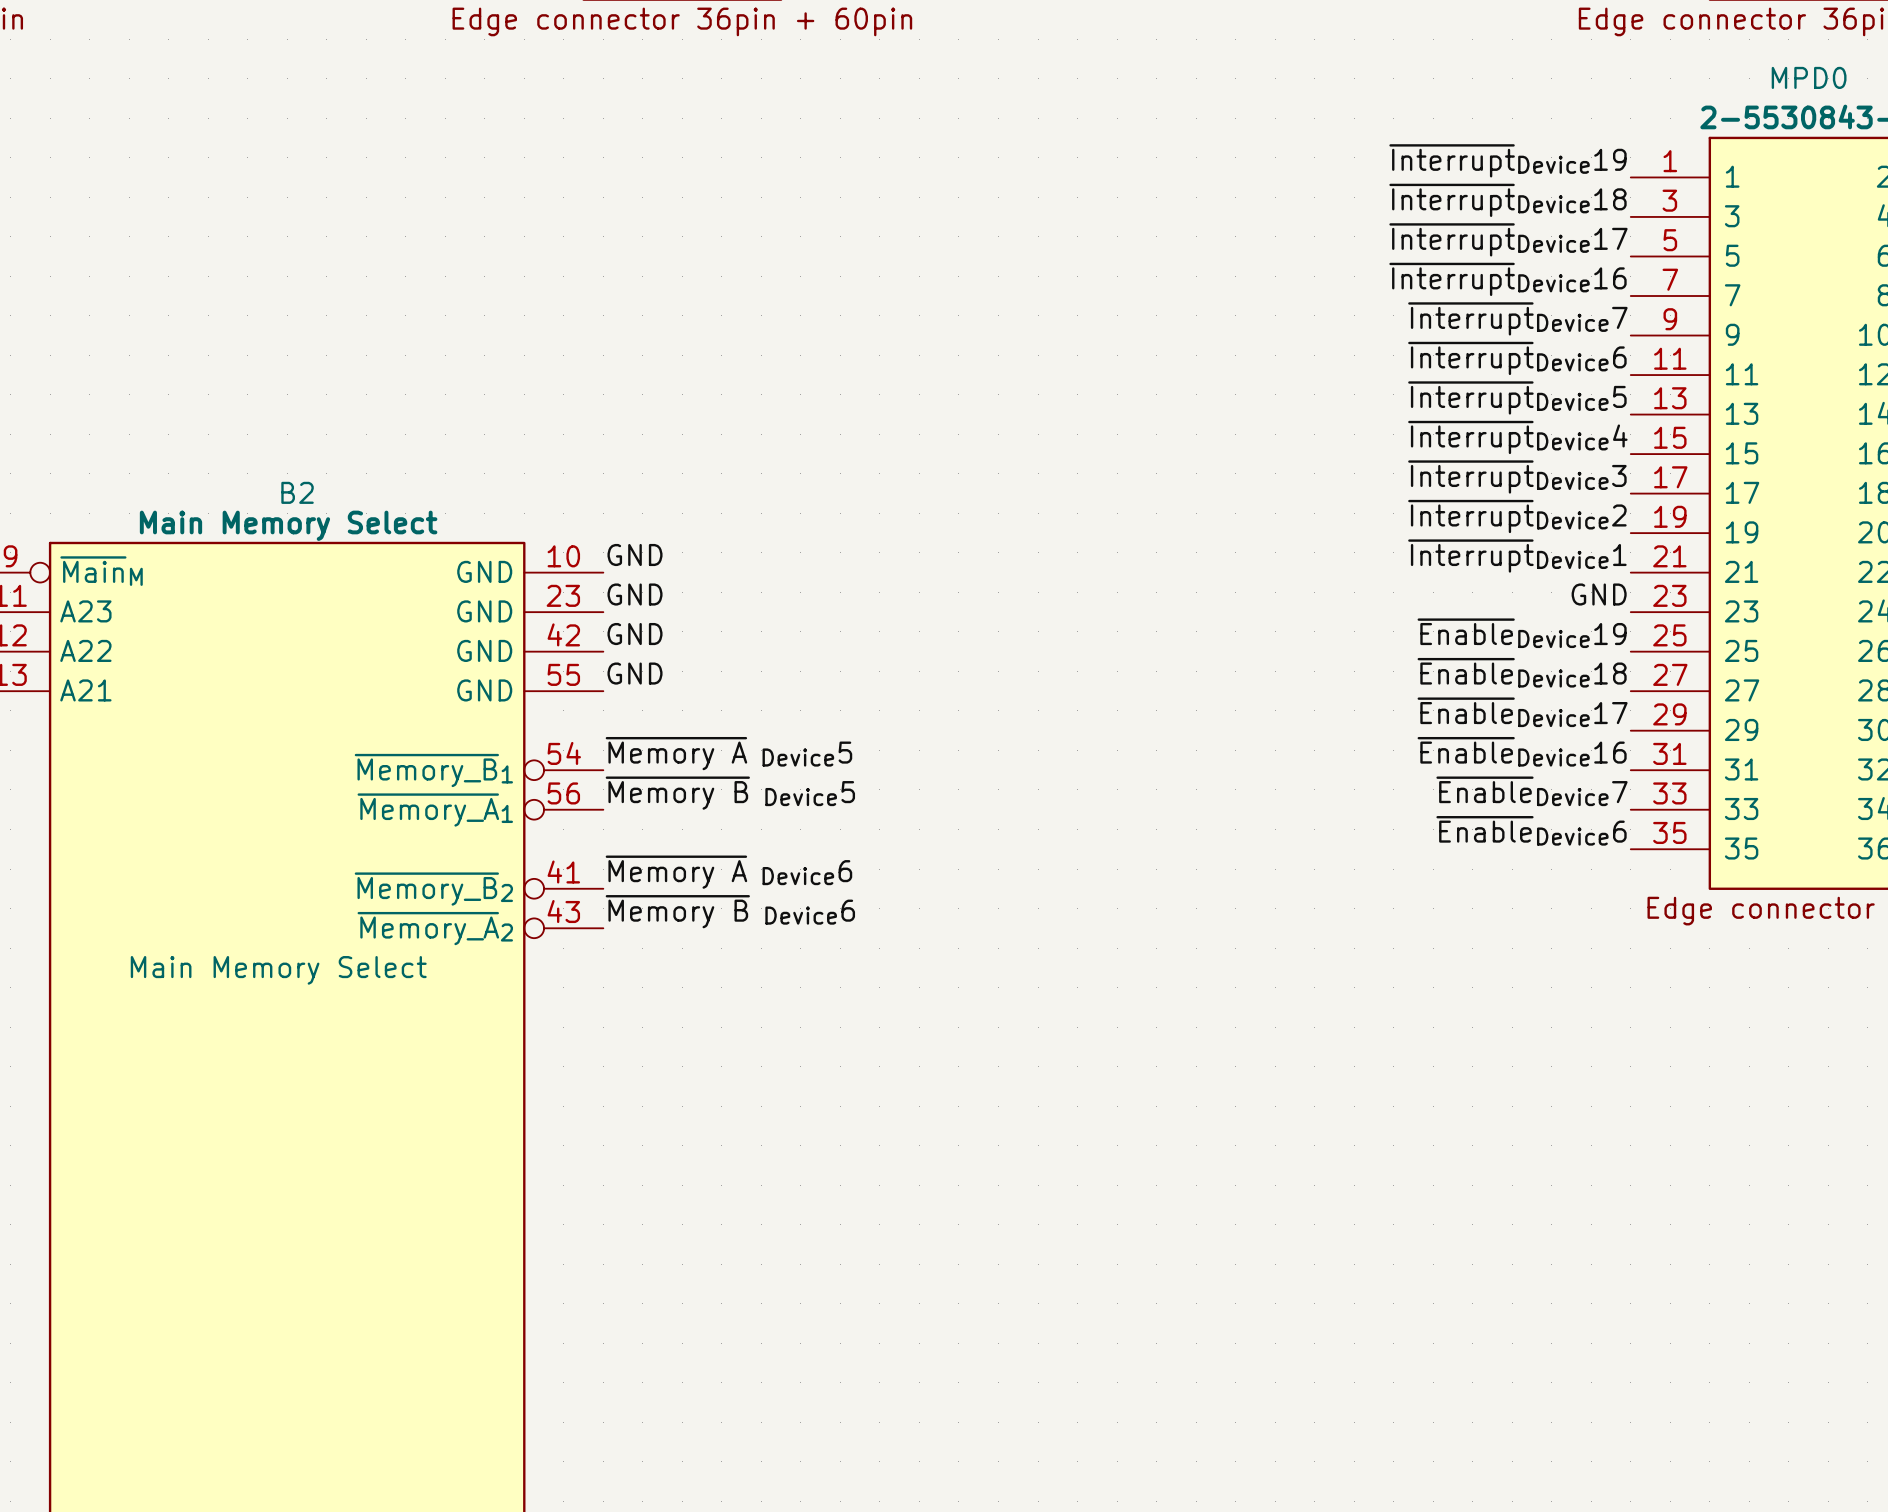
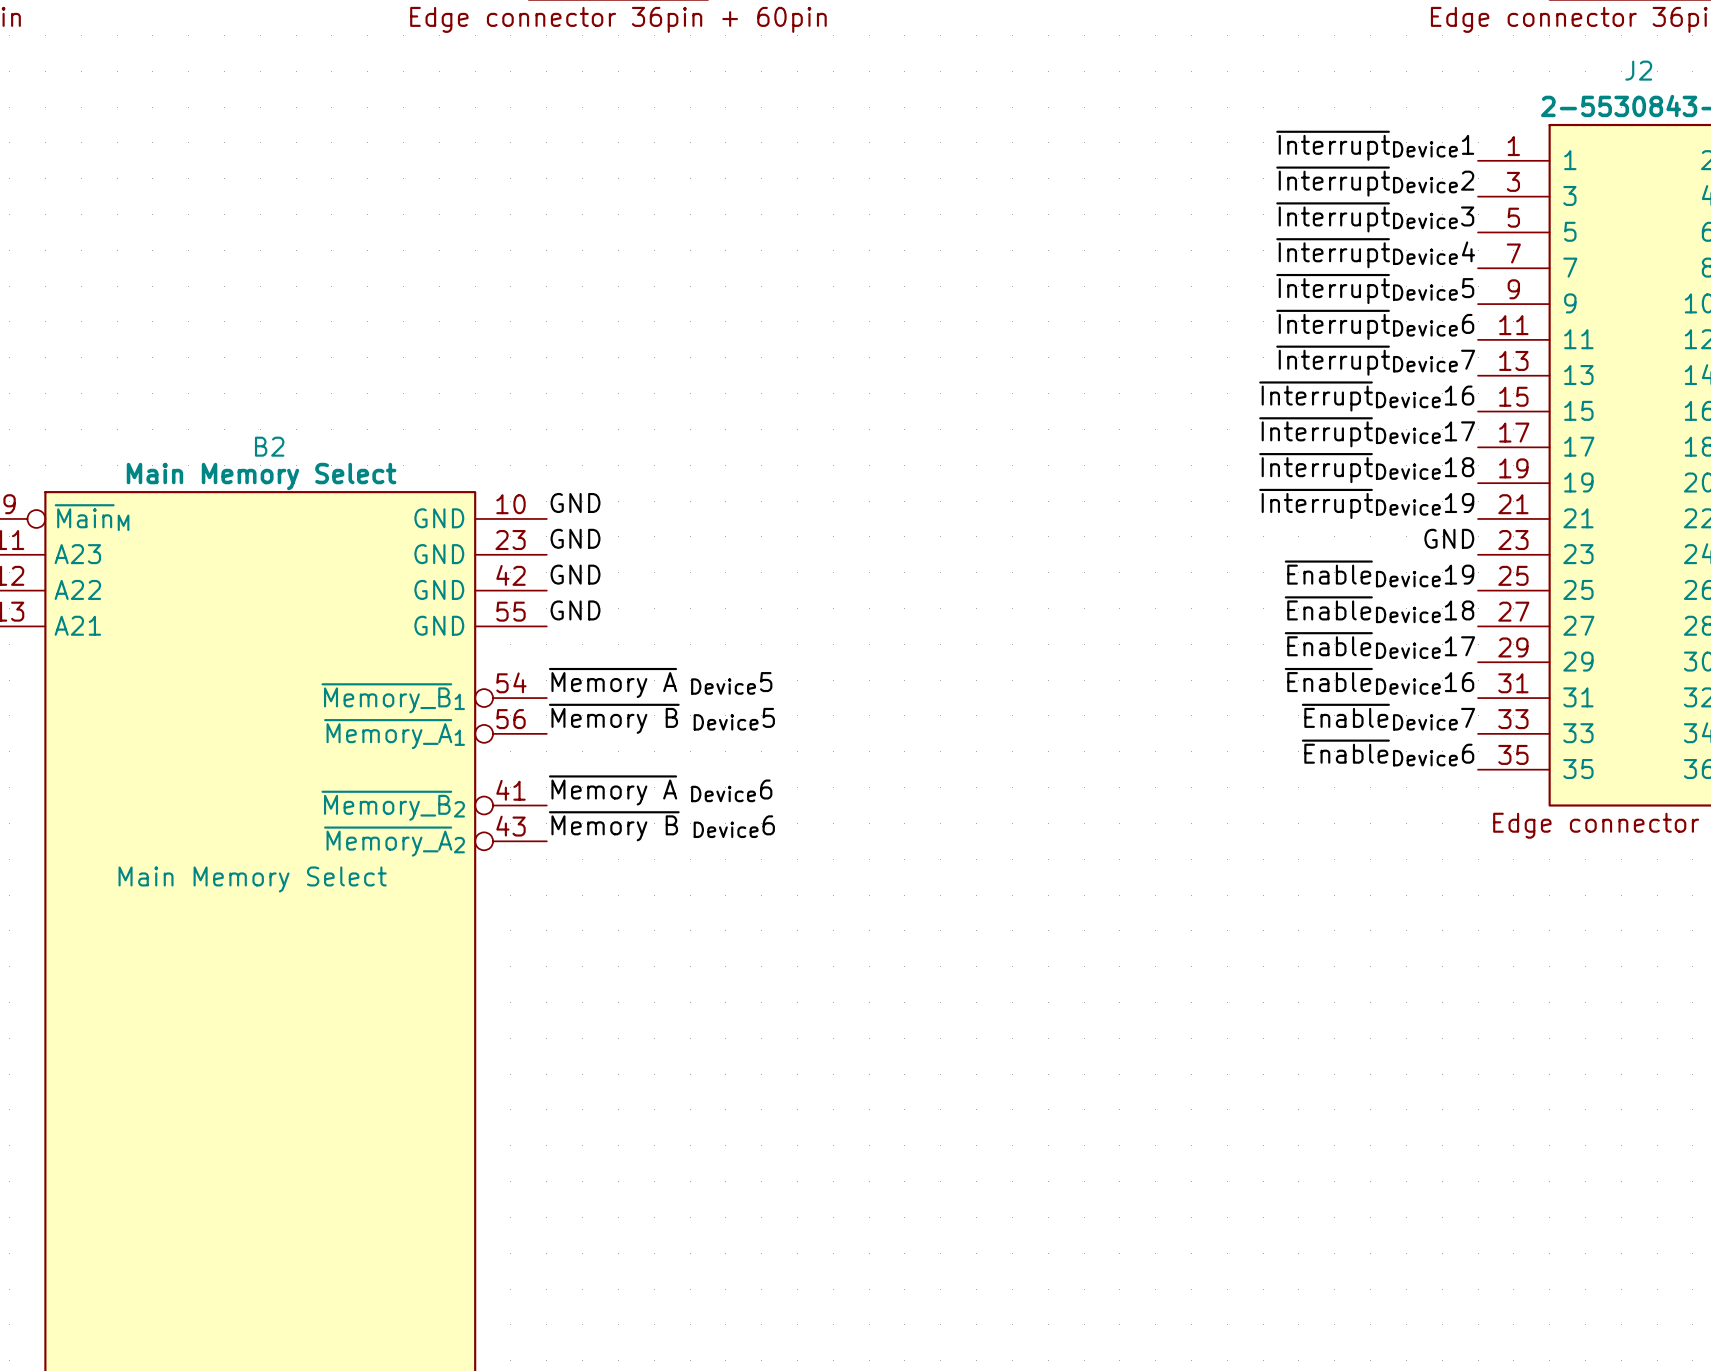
MPD0 name: MPD0 (1809, 77) -> J2 (1638, 70)
label: ~{Interrupt}Device19 (1508, 160) -> ~{Interrupt}Device1 (1375, 145)
label: ~{Interrupt}Device18 (1508, 200) -> ~{Interrupt}Device2 (1375, 181)
label: ~{Interrupt}Device17 (1508, 239) -> ~{Interrupt}Device3 (1375, 217)
label: ~{Interrupt}Device16 (1508, 279) -> ~{Interrupt}Device4 (1375, 253)
label: ~{Interrupt}Device7 (1517, 318) -> ~{Interrupt}Device5 (1375, 289)
label: ~{Interrupt}Device5 (1517, 397) -> ~{Interrupt}Device7 (1375, 360)
label: ~{Interrupt}Device4 (1517, 437) -> ~{Interrupt}Device16 (1366, 396)
label: ~{Interrupt}Device3 (1517, 476) -> ~{Interrupt}Device17 (1367, 432)
label: ~{Interrupt}Device2 (1517, 516) -> ~{Interrupt}Device18 (1366, 468)
label: ~{Interrupt}Device1 (1517, 556) -> ~{Interrupt}Device19 (1366, 503)

